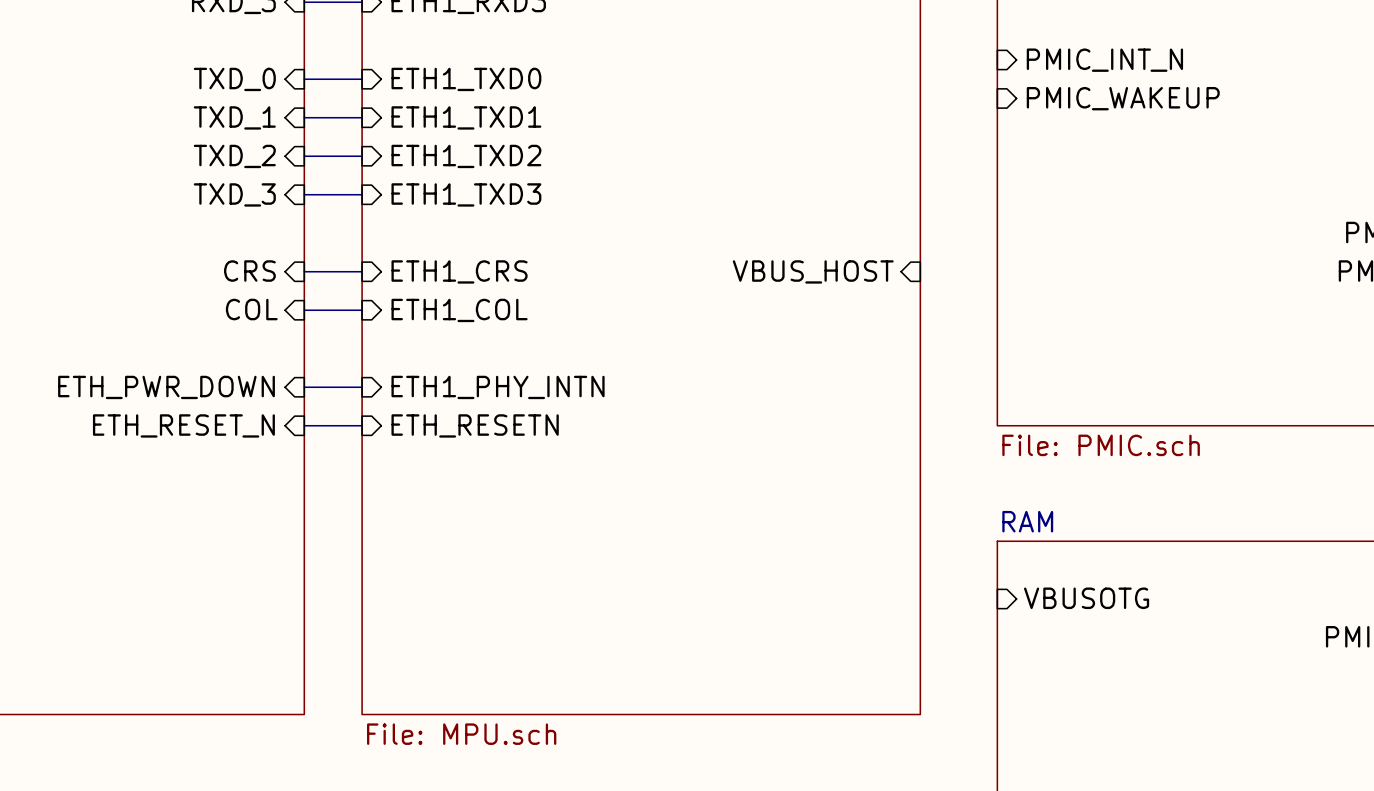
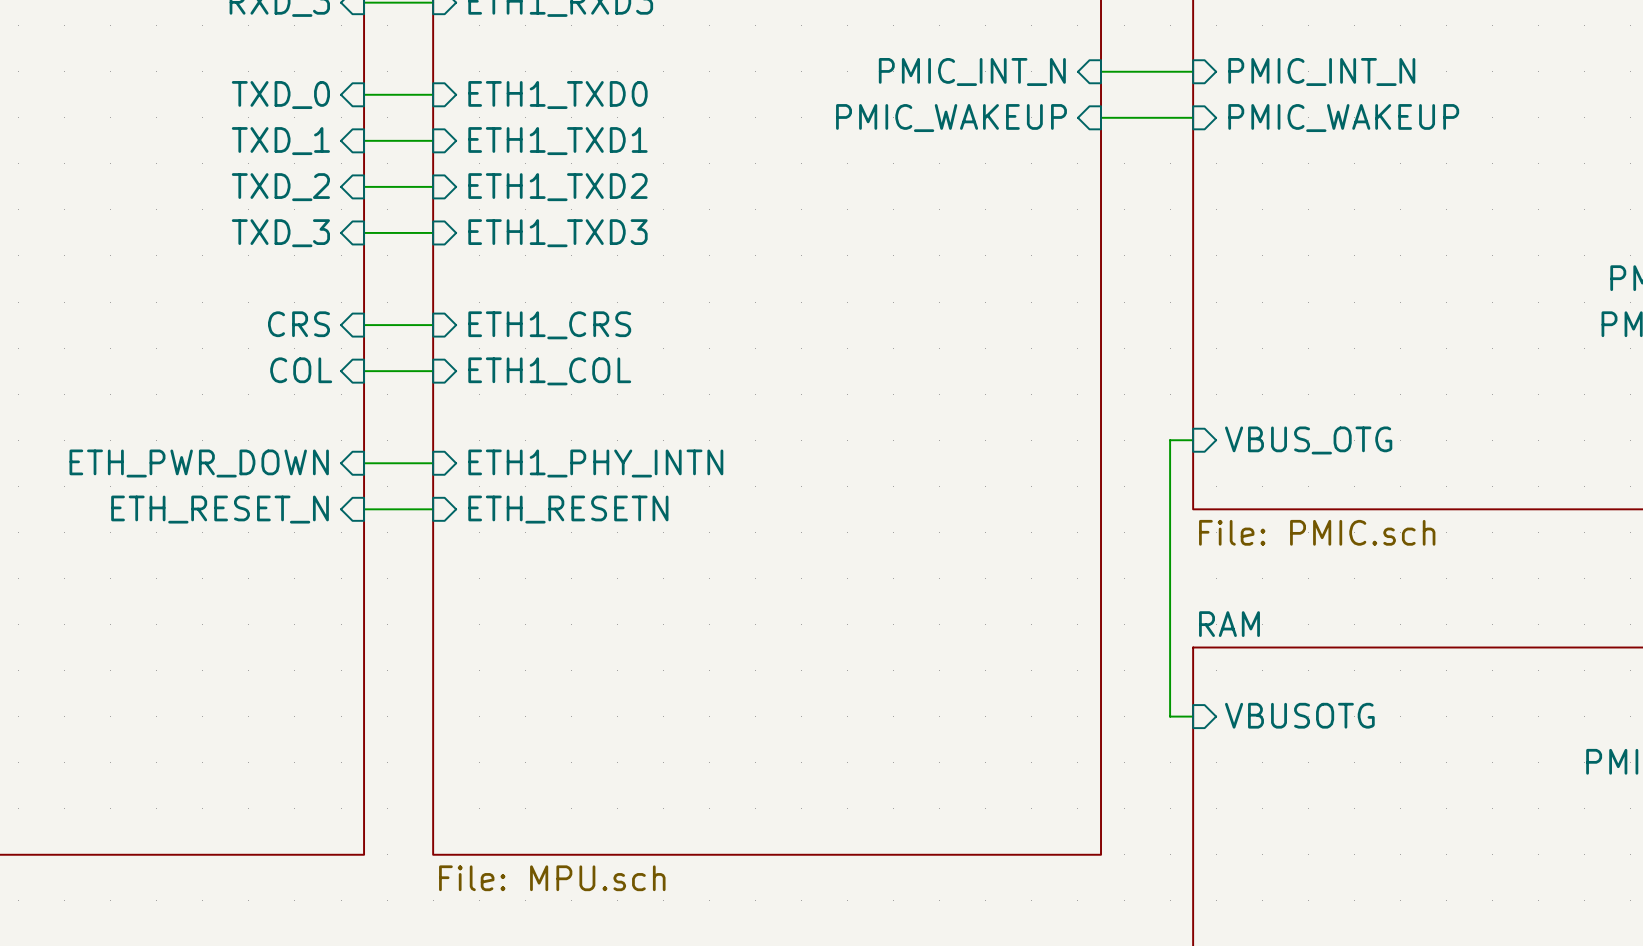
wire: none -> (1101, 71) (1193, 71)
sheet pin: none -> PMIC_INT_N (972, 71)
sheet pin: none -> PMIC_WAKEUP (951, 118)
wire: none -> (1101, 117) (1193, 117)
sheet pin: VBUS_HOST (813, 271) -> none
wire: none -> (1193, 440) (1170, 440) (1170, 716) (1193, 716)
sheet pin: none -> VBUS_OTG (1308, 440)

